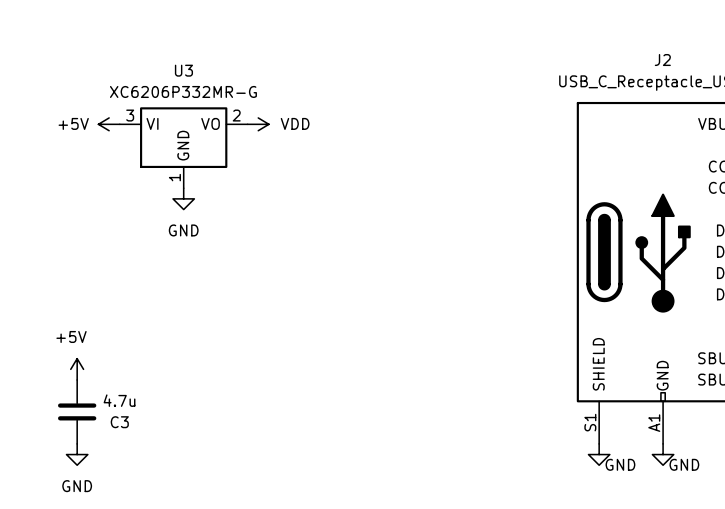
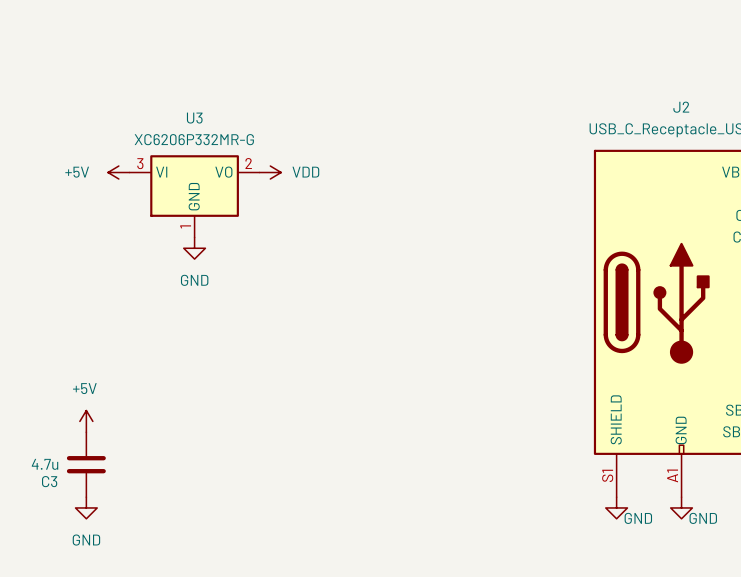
C3 value position: 4.7u (119, 400) -> 4.7u (45, 464)
C3 name position: C3 (119, 422) -> C3 (49, 481)

